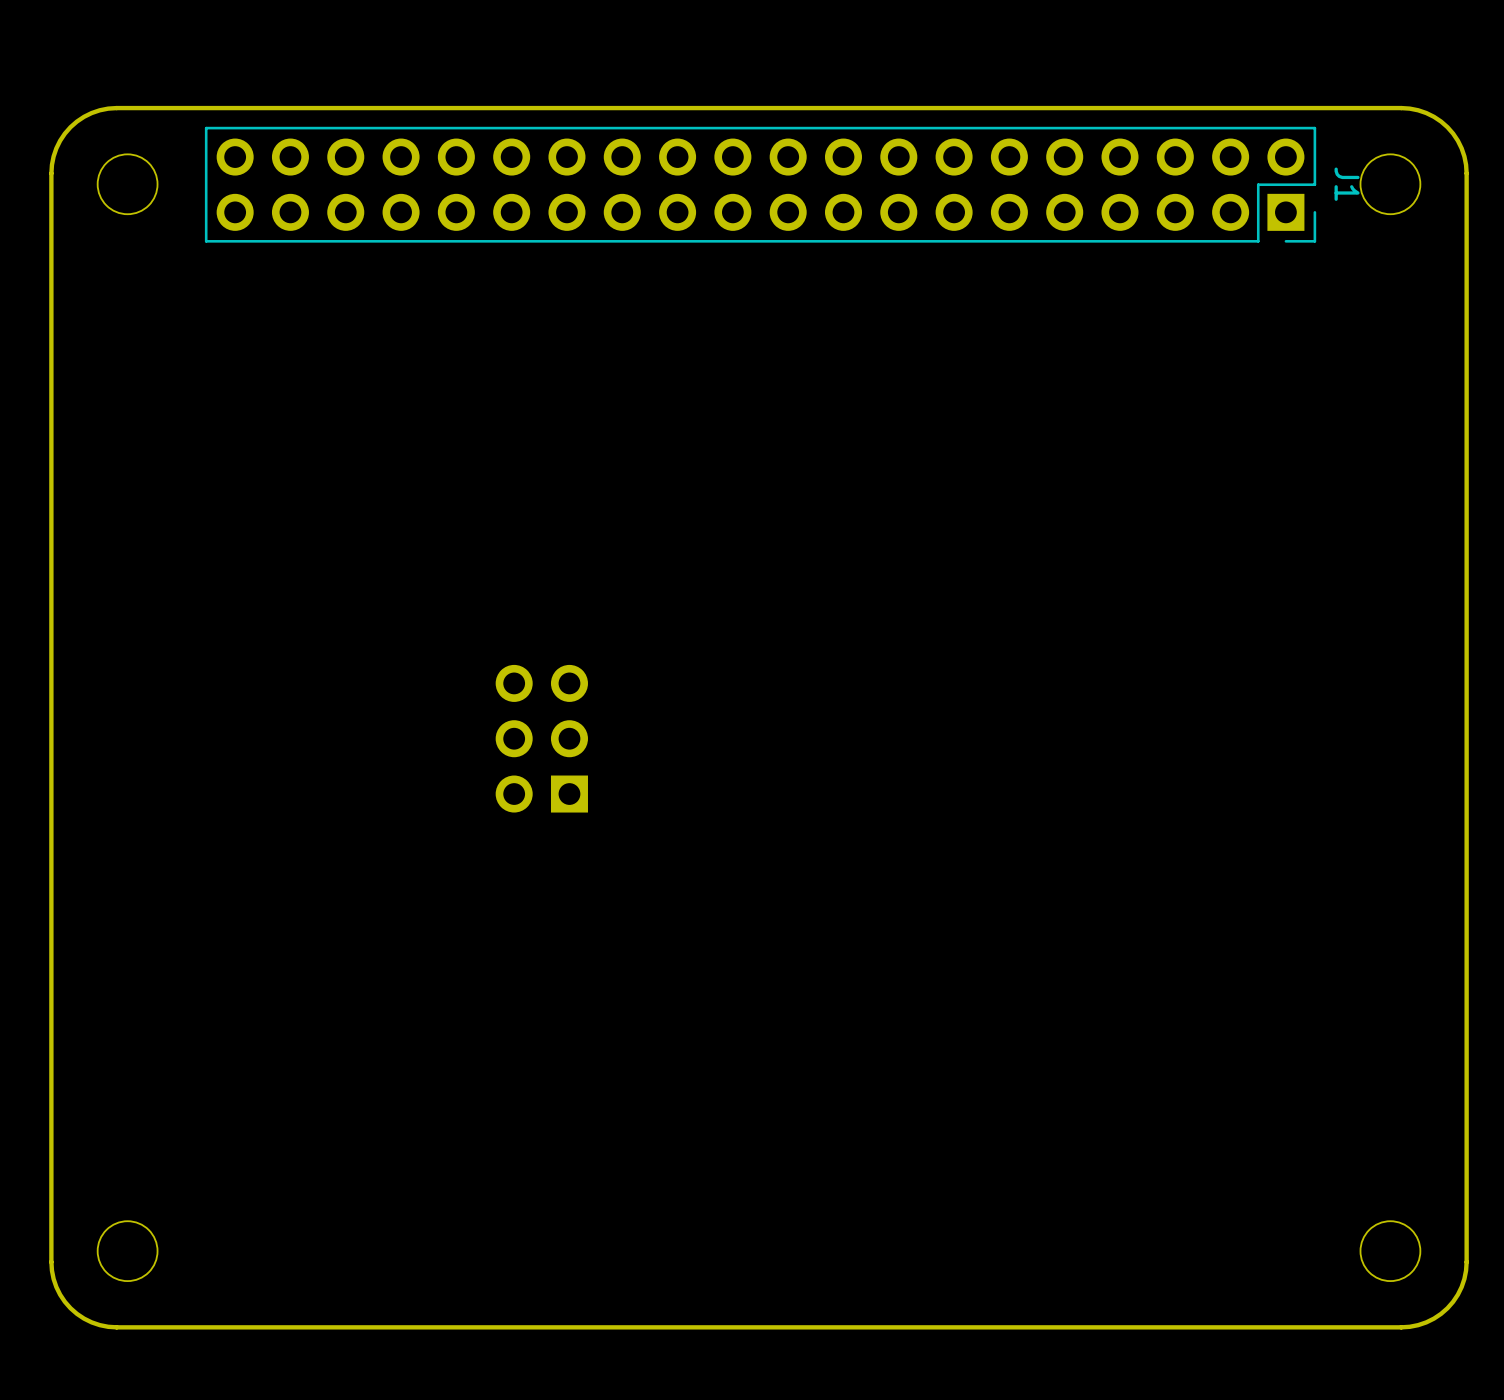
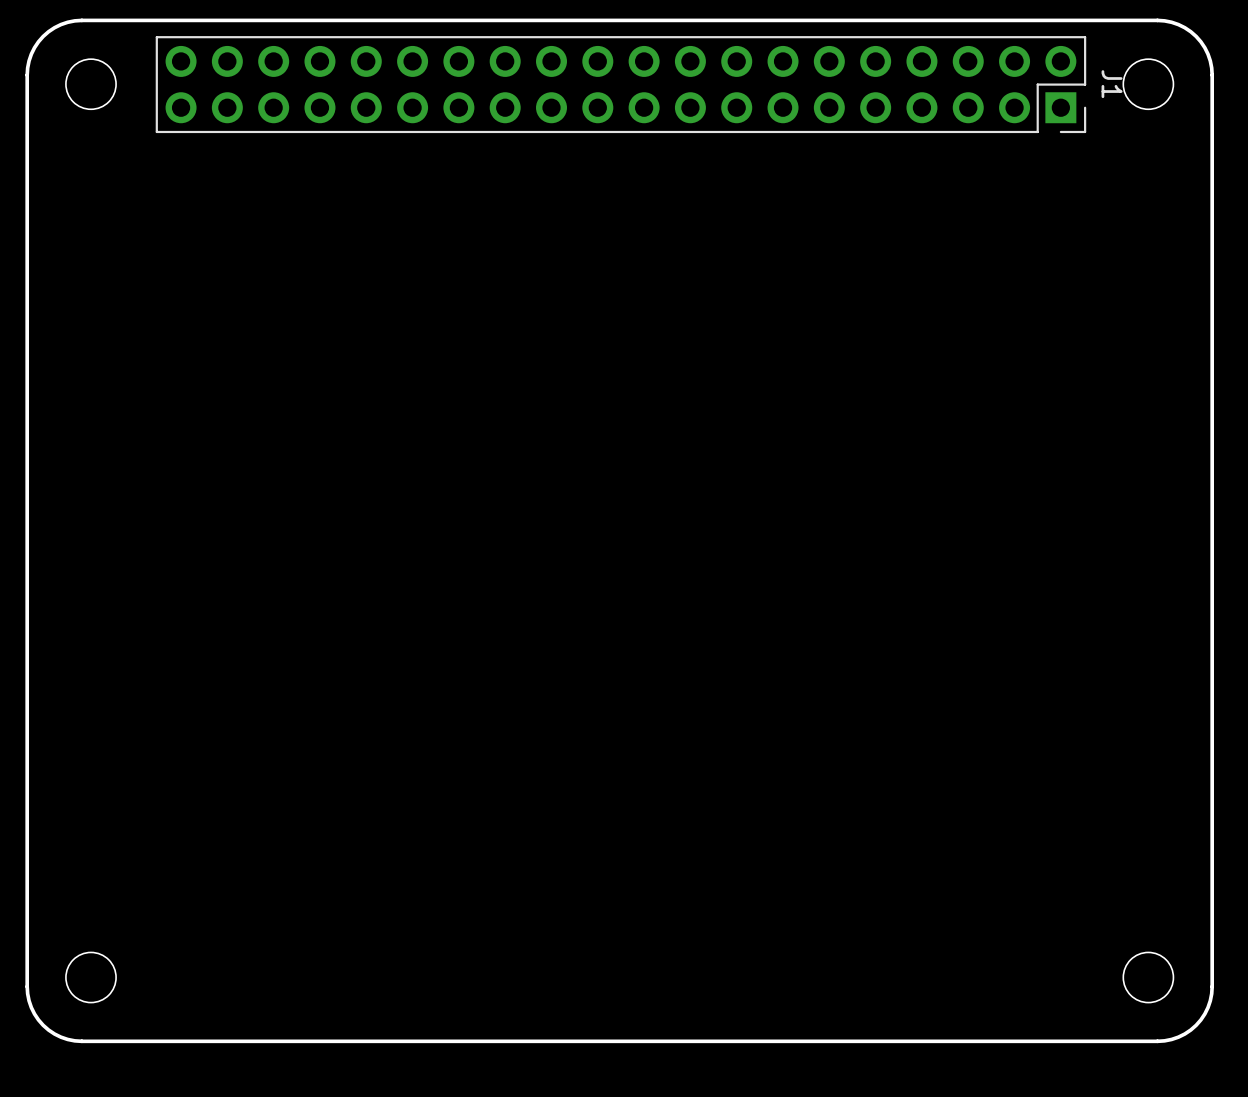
part: (541, 738) -> none

